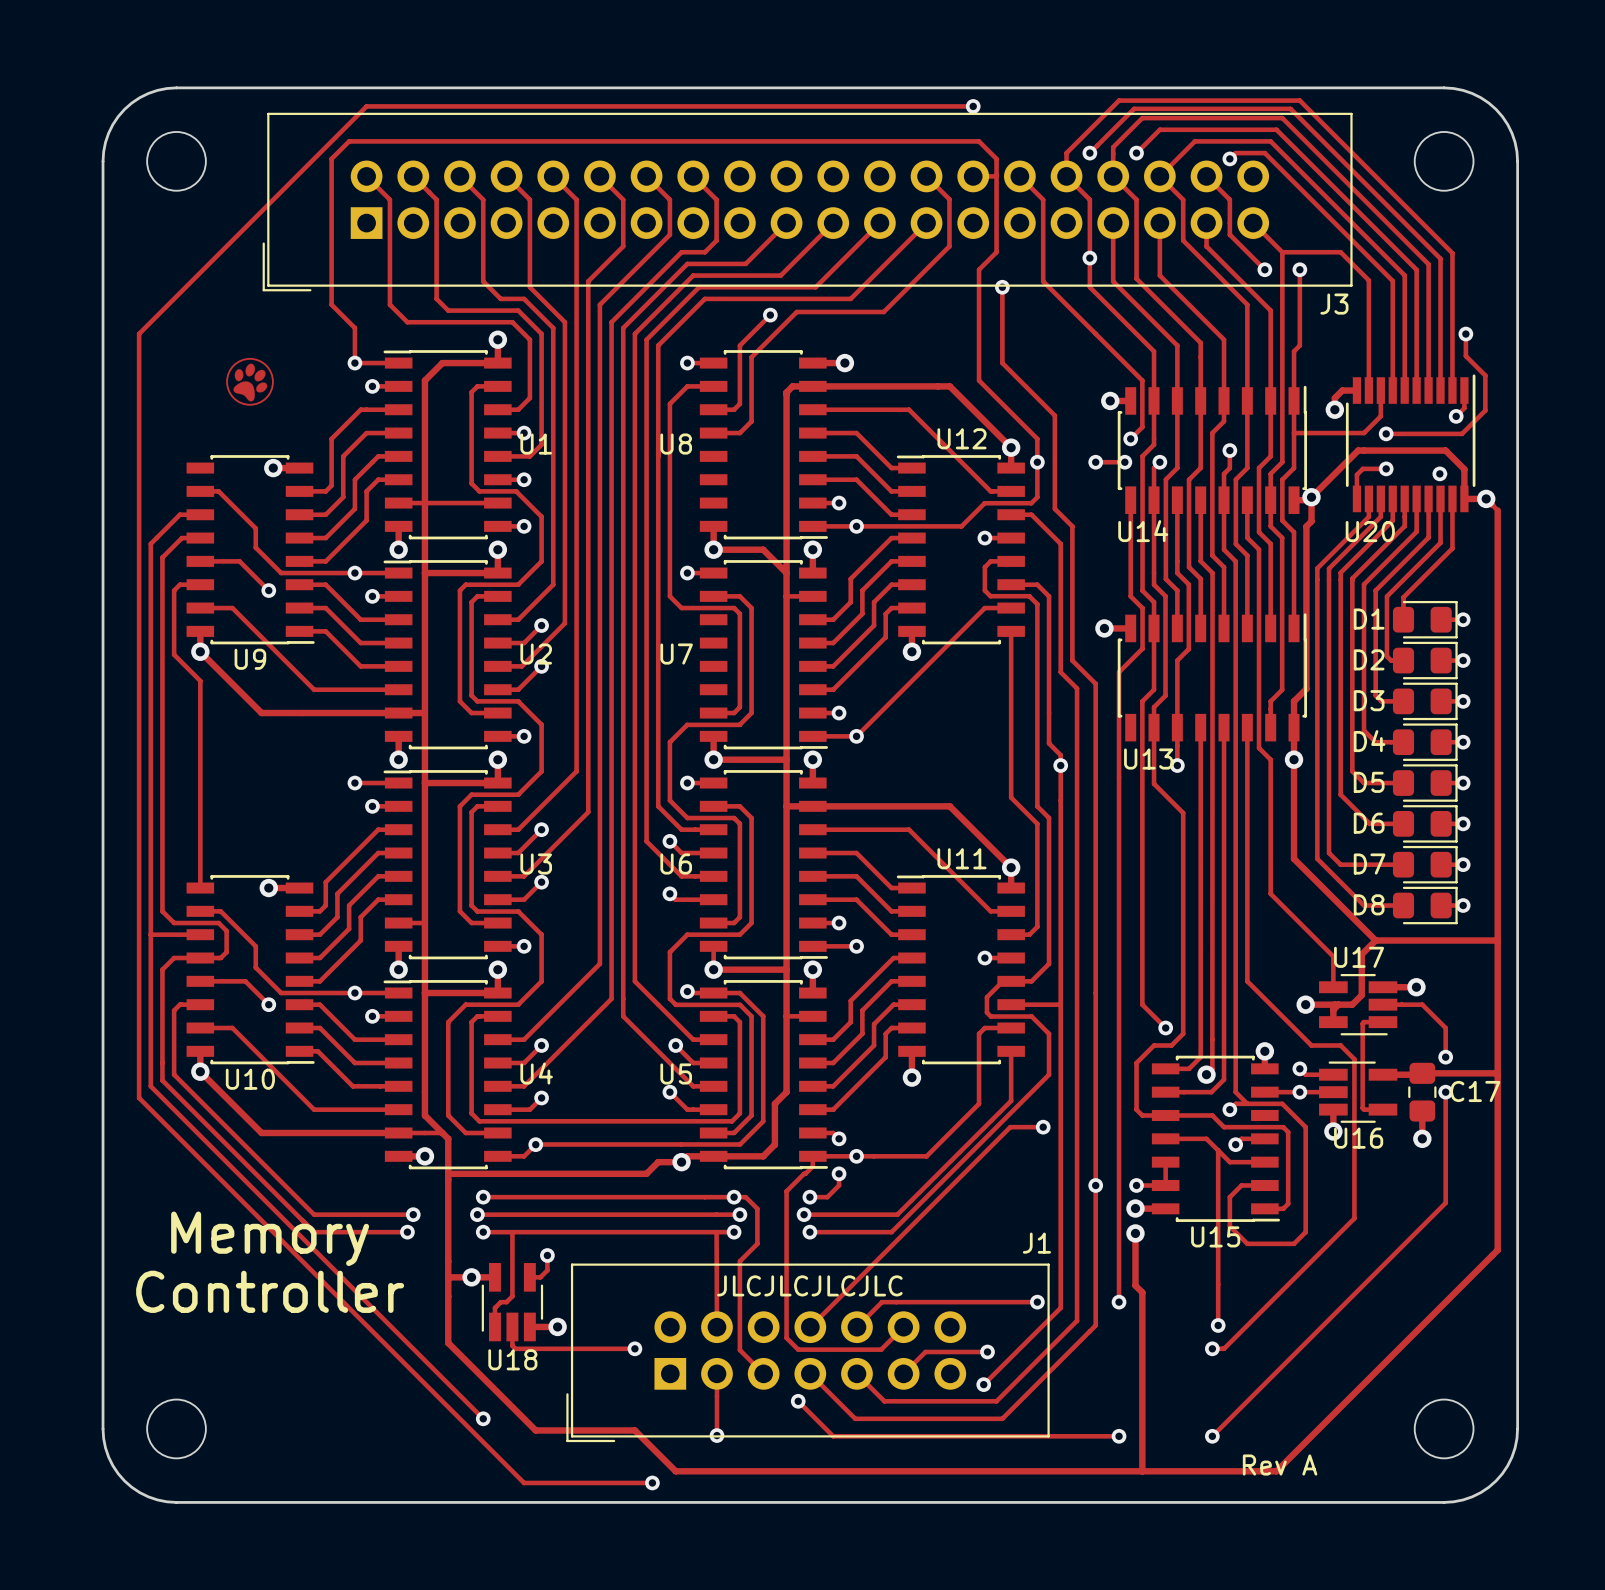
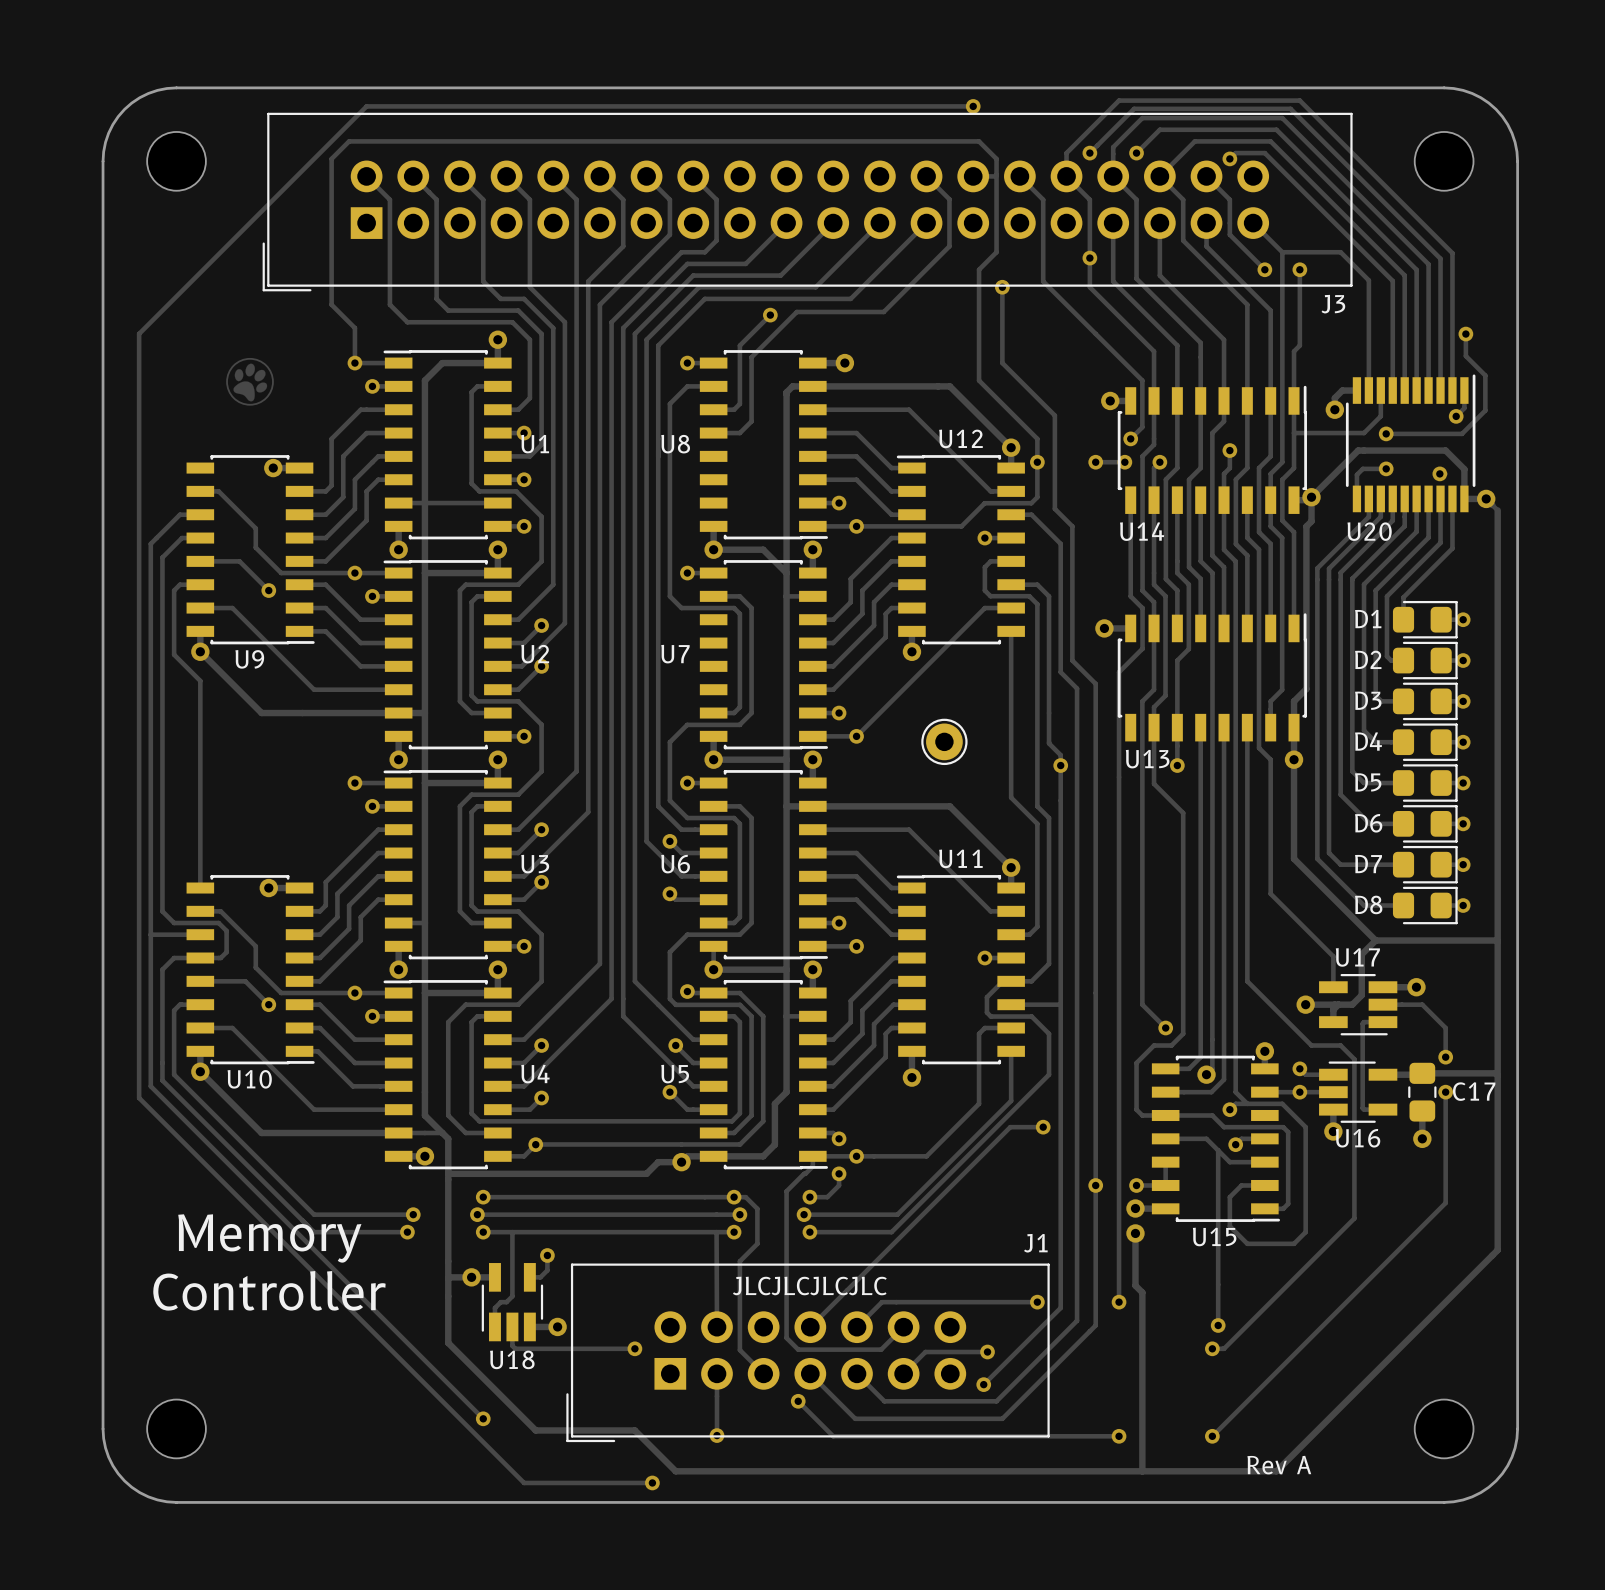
part: none -> (944, 741)

